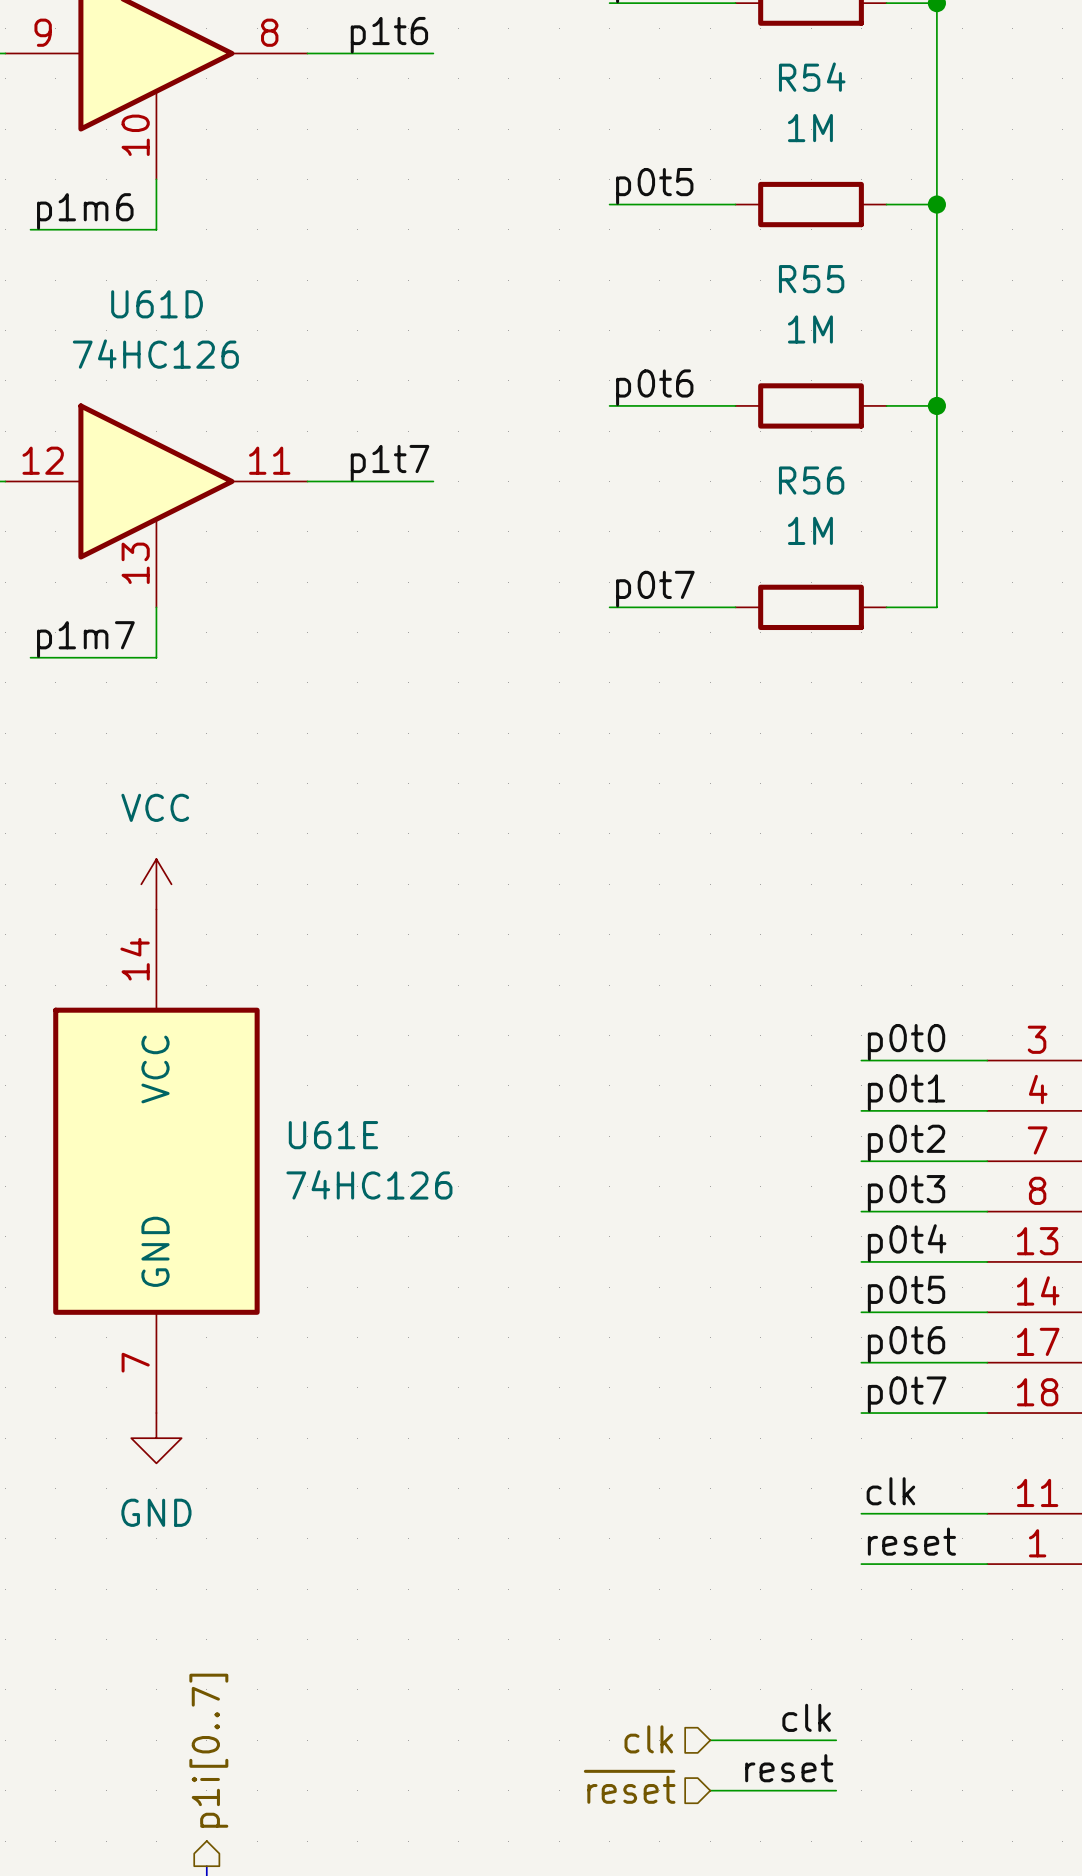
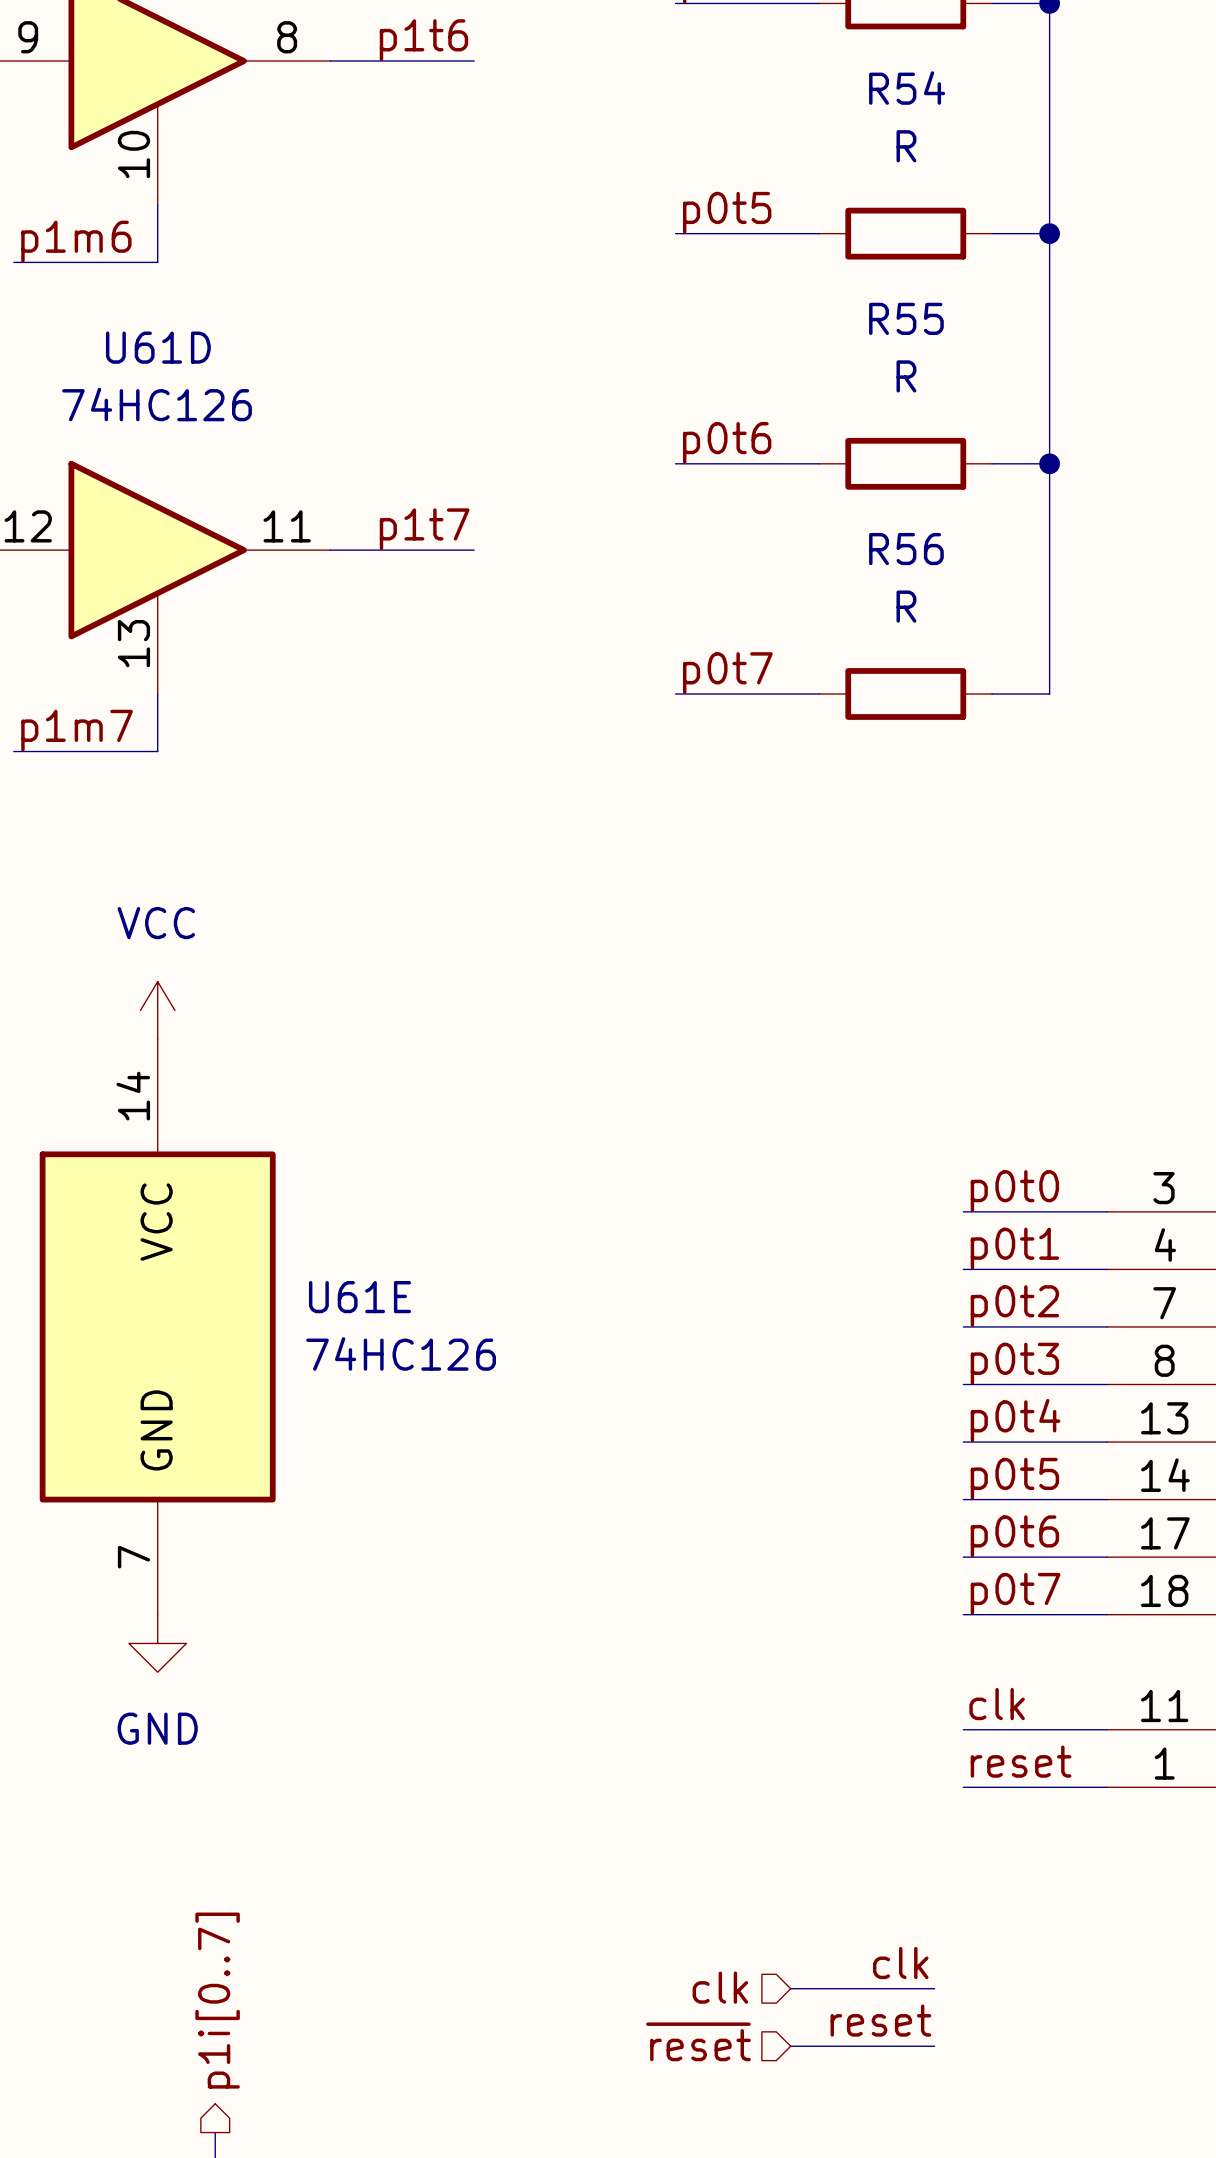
R54 value: 1M (810, 128) -> R (906, 146)
R55 value: 1M (810, 329) -> R (906, 376)
R56 value: 1M (810, 530) -> R (906, 606)

